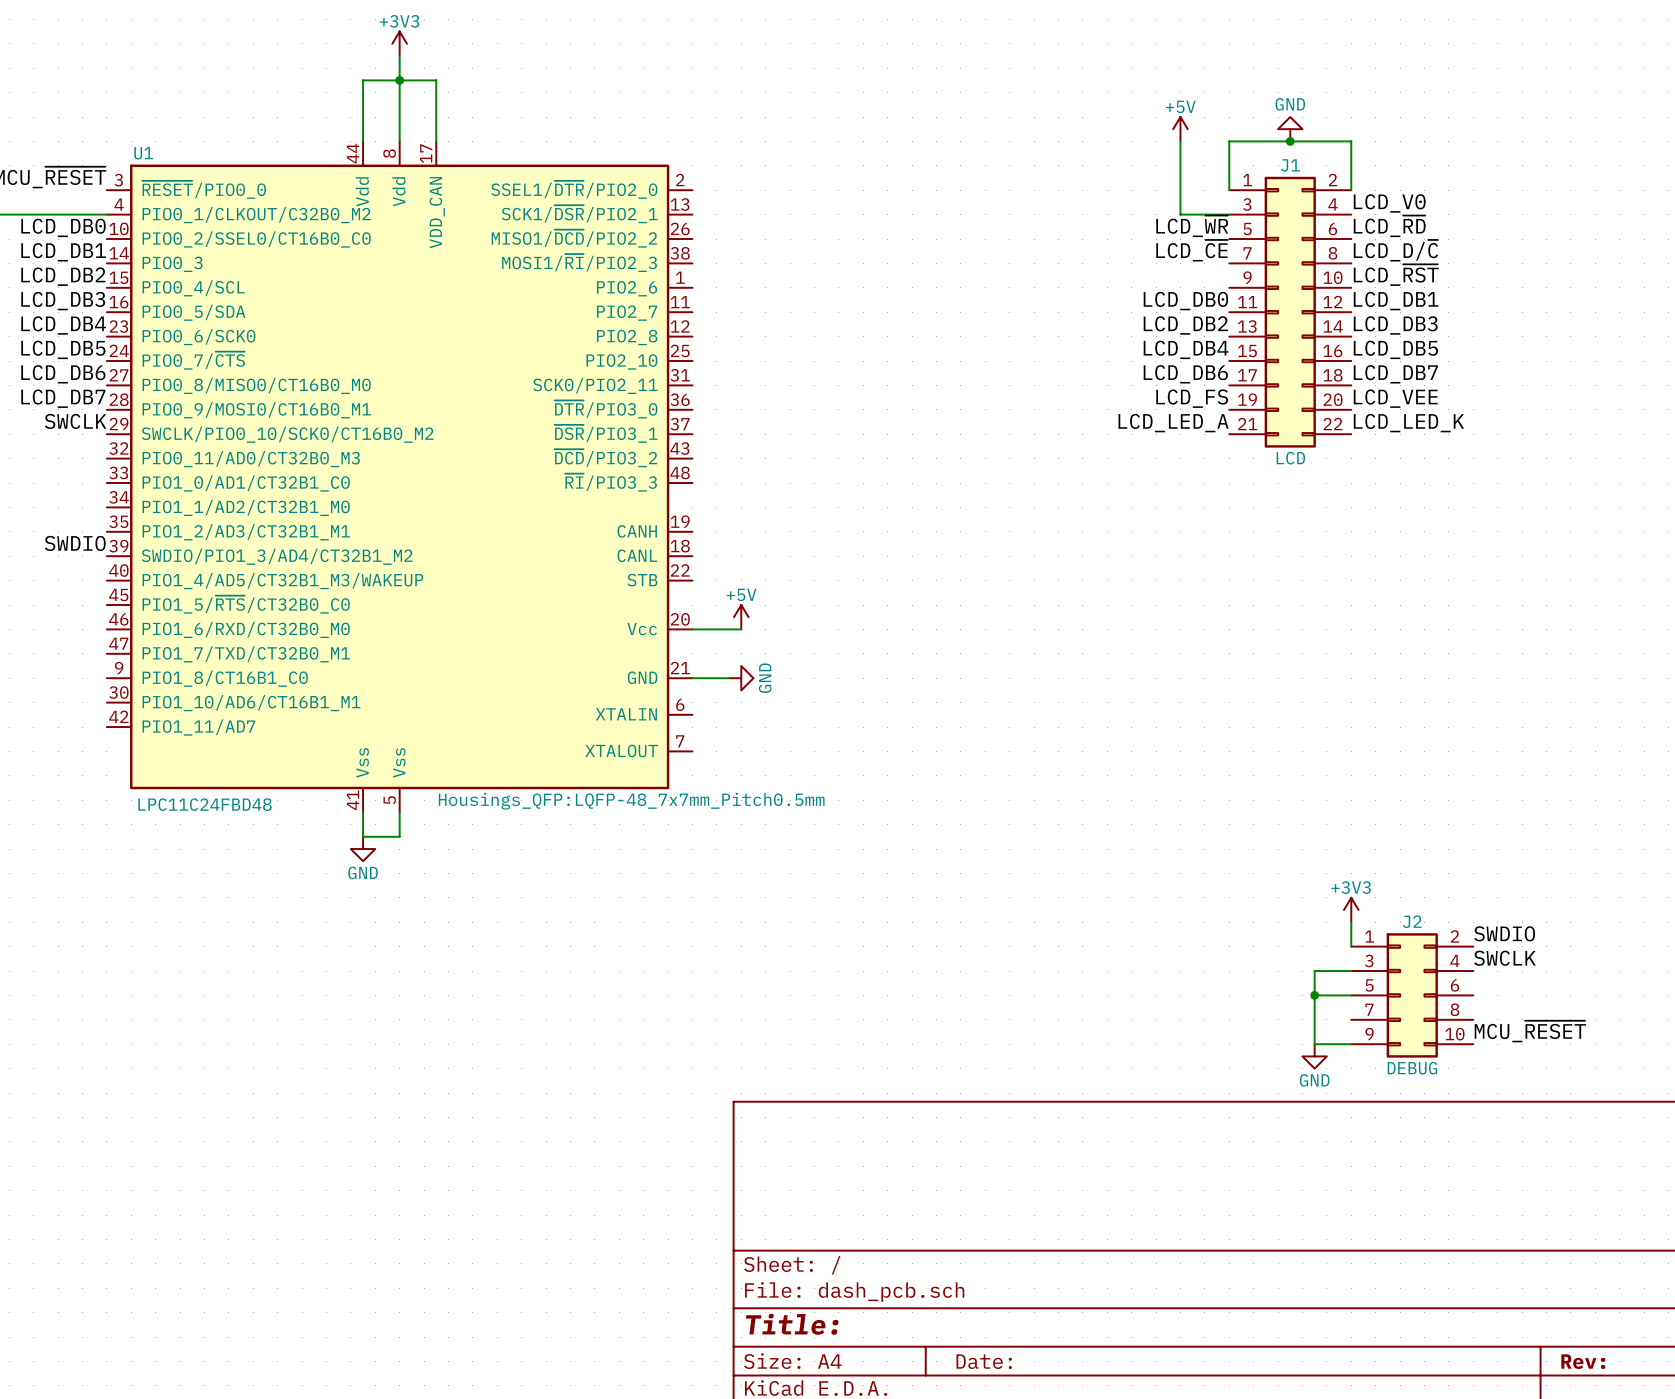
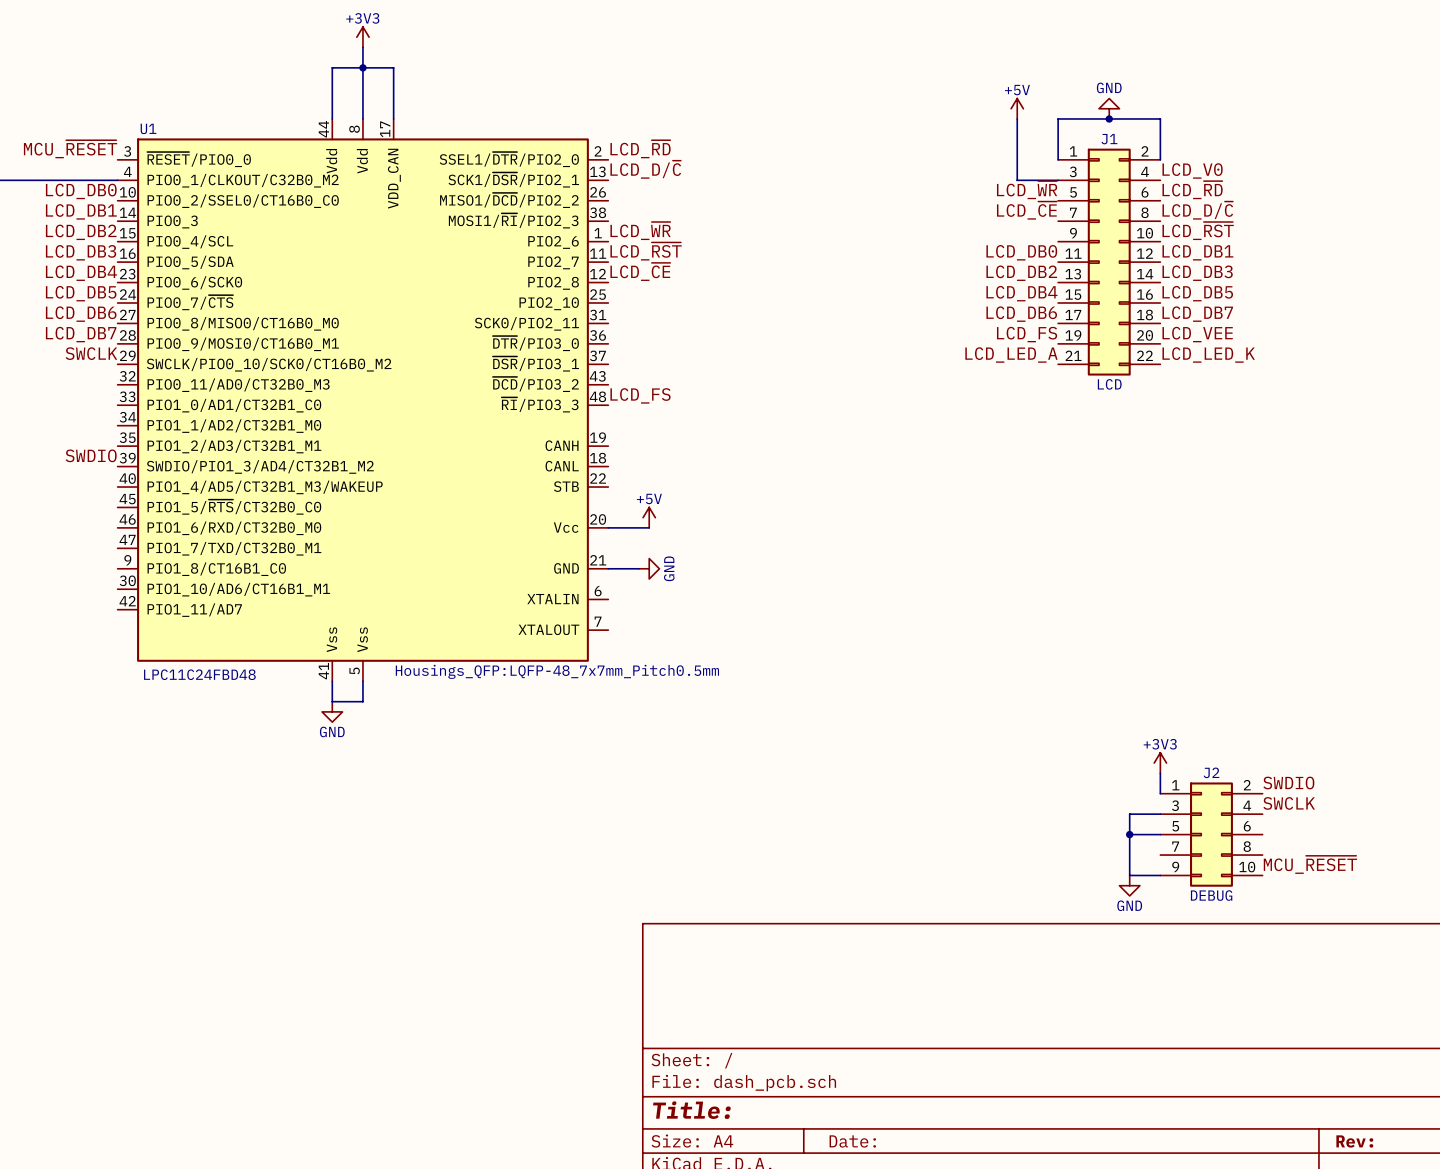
label: none -> LCD_~{RD} (640, 149)
label: none -> LCD_D/~{C} (645, 169)
label: none -> LCD_~{WR} (640, 231)
label: none -> LCD_~{RST} (646, 251)
label: none -> LCD_~{CE} (640, 271)
label: none -> LCD_FS (640, 395)

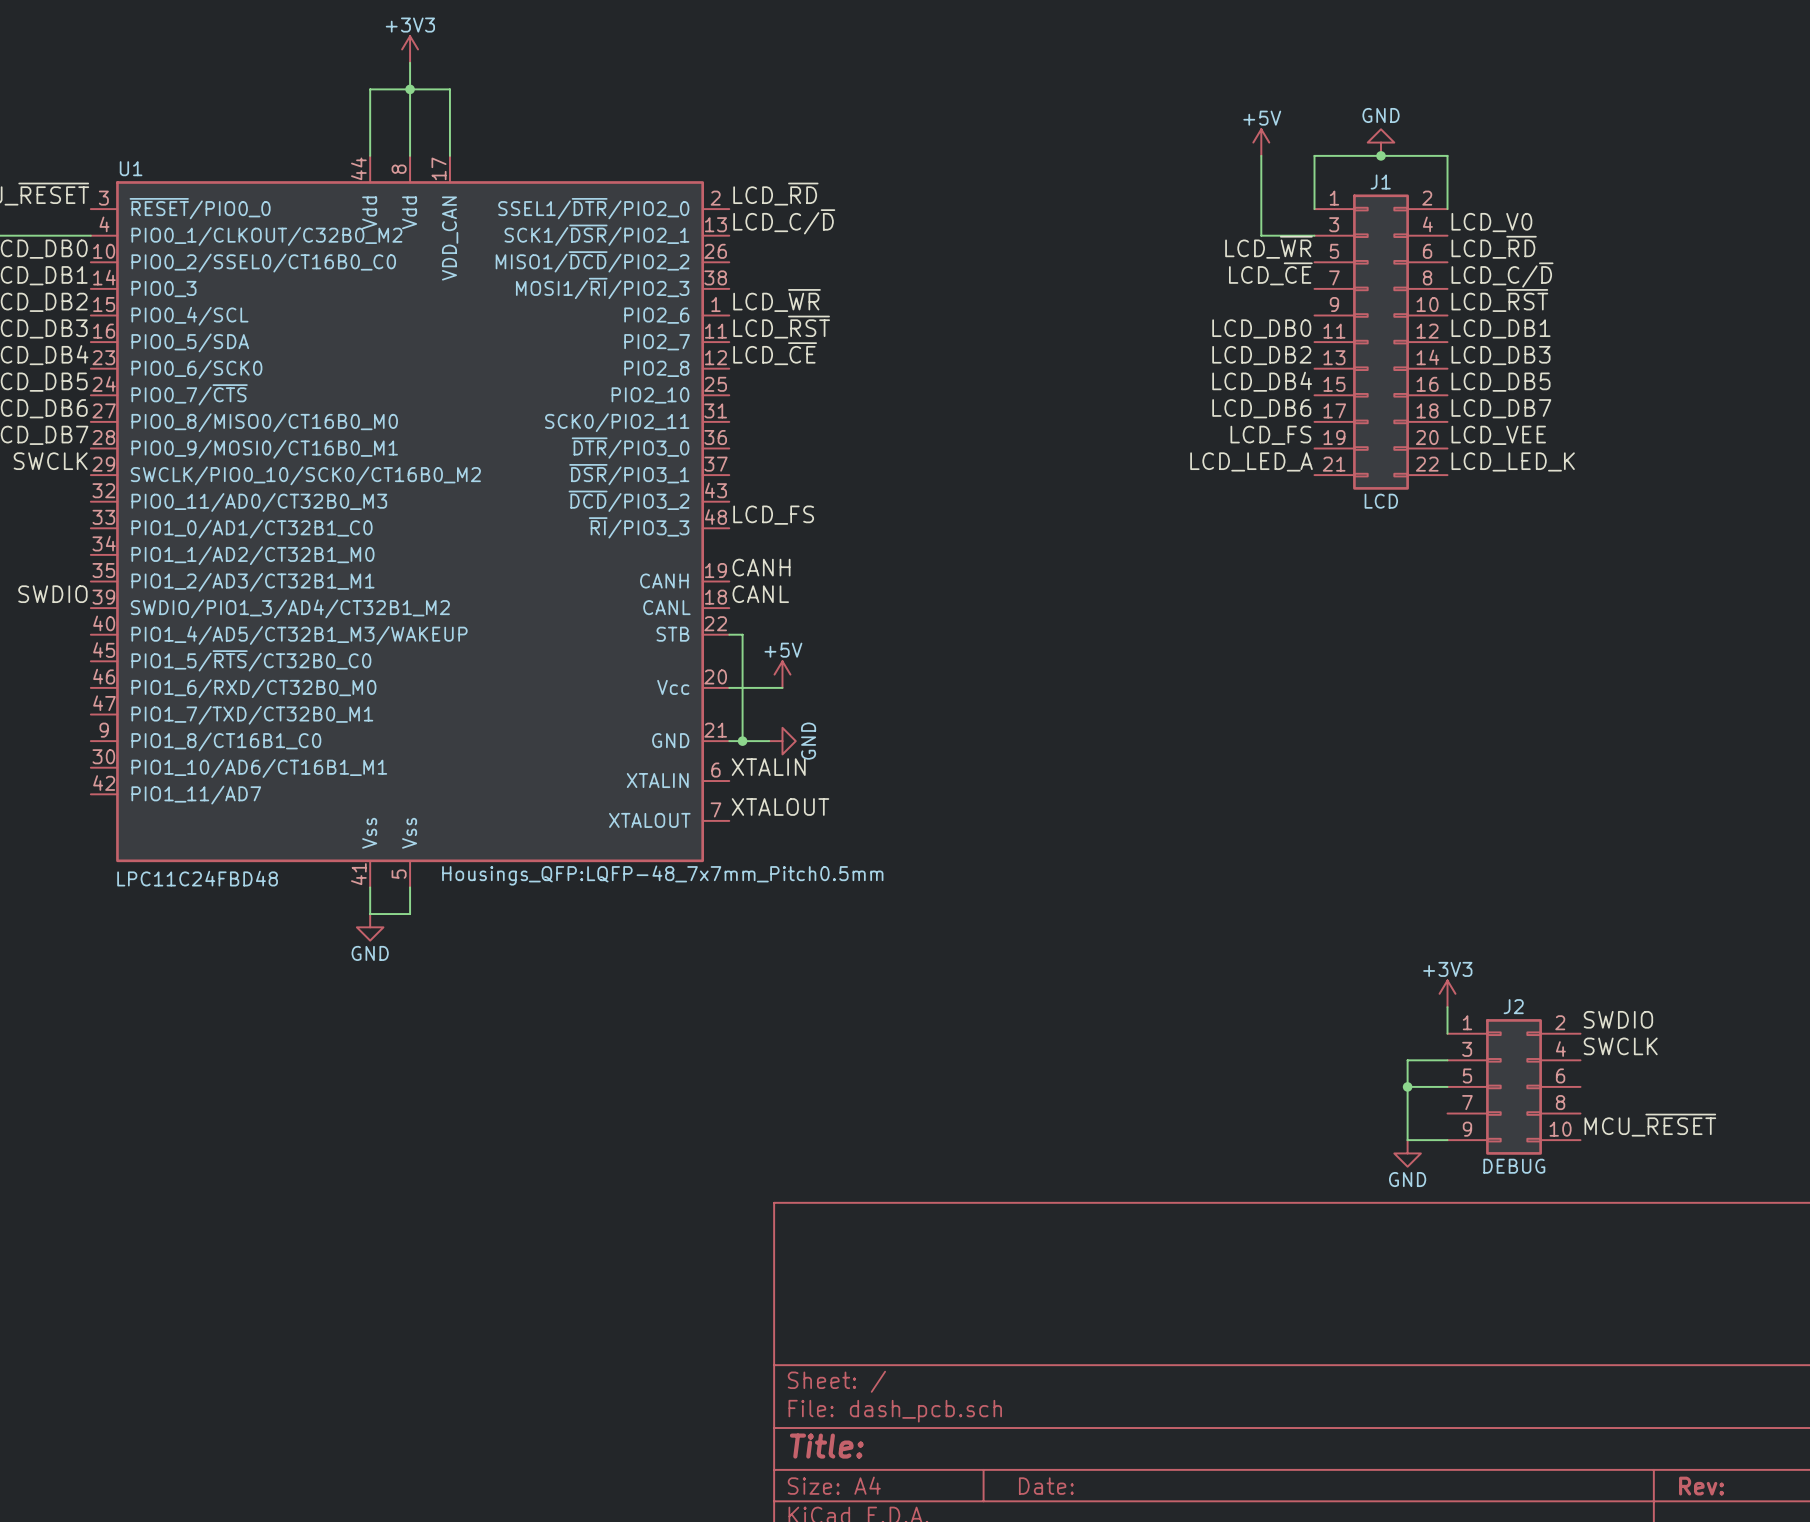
label: LCD_D/~{C} (645, 169) -> LCD_C/~{D} (784, 221)
label: LCD_D/~{C} (1197, 210) -> LCD_C/~{D} (1502, 275)
label: none -> CANH (761, 567)
label: none -> CANL (760, 594)
wire: none -> (729, 634) (742, 634) (742, 741)
junction: none -> (742, 741)
label: none -> XTALIN (768, 767)
label: none -> XTALOUT (780, 806)

